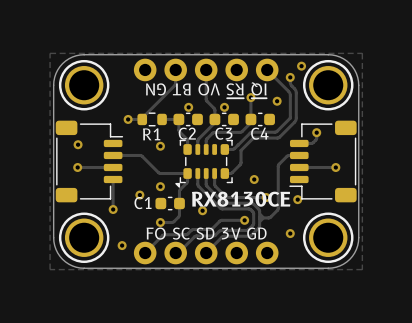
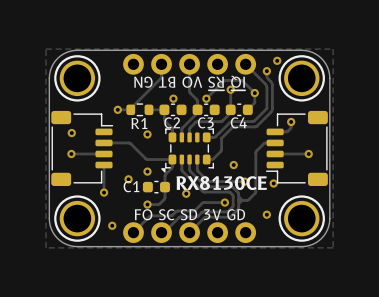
track: none -> (206, 98) (224, 80) (242, 80) (254, 93) (254, 102) (247, 109)

